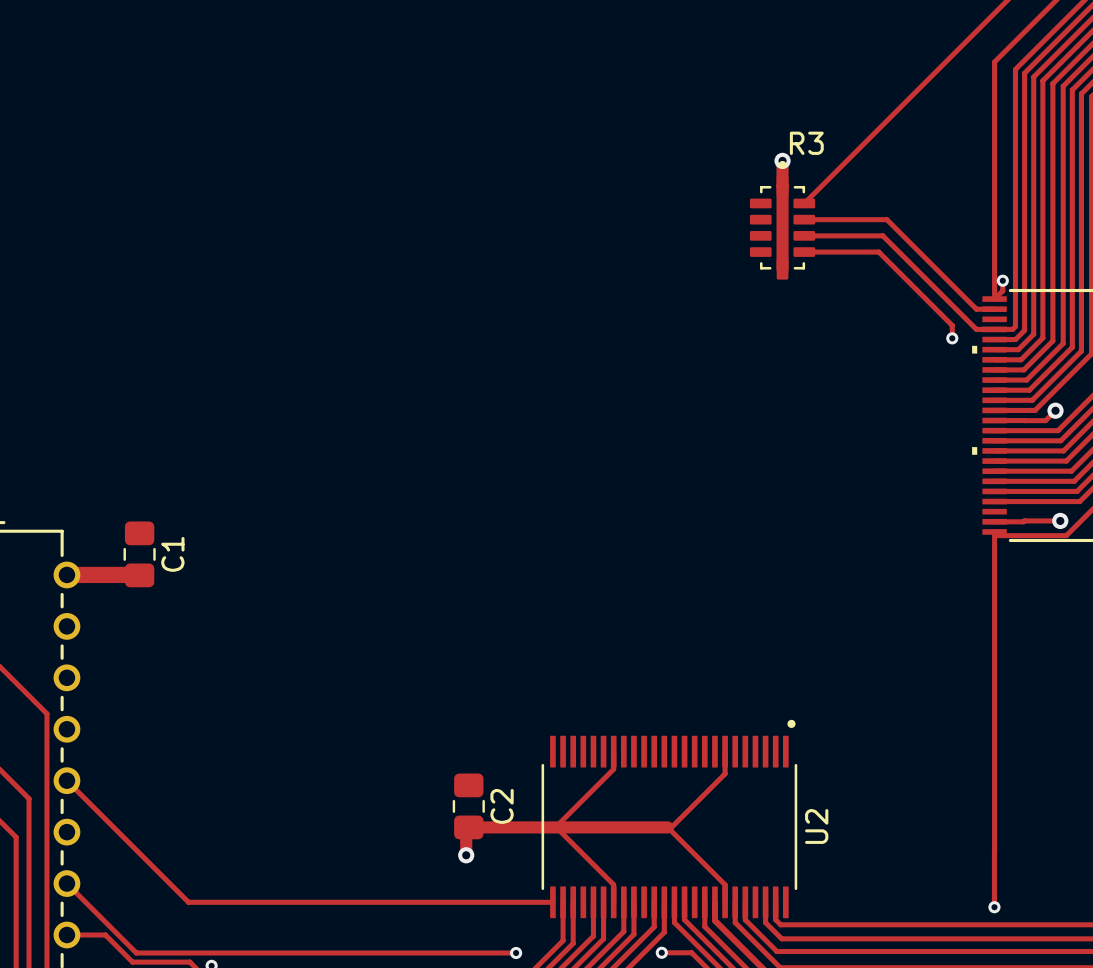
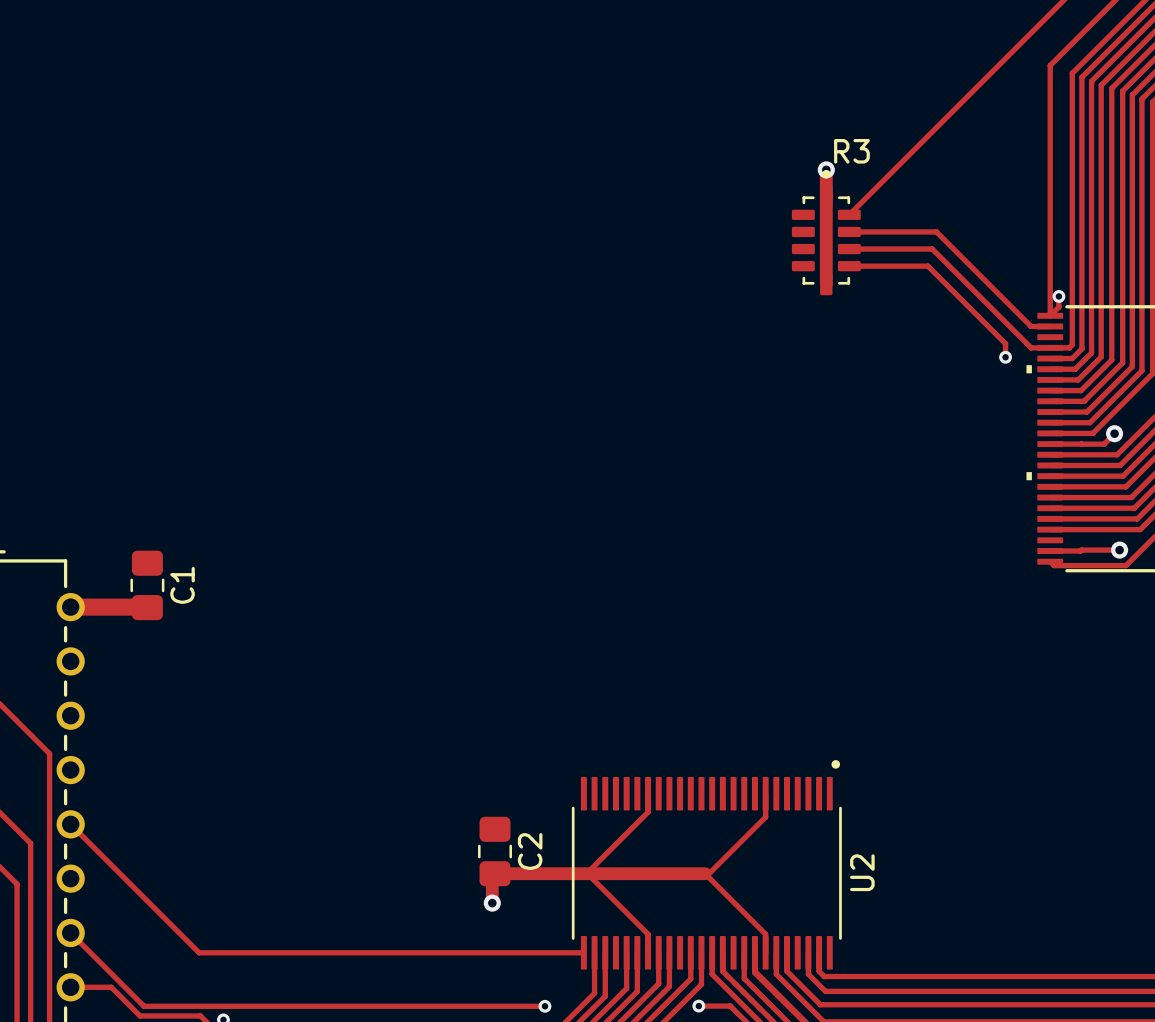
track: (994, 531) (994, 851) -> none
track: (994, 851) (994, 907) -> none
via: (994, 907) -> none

